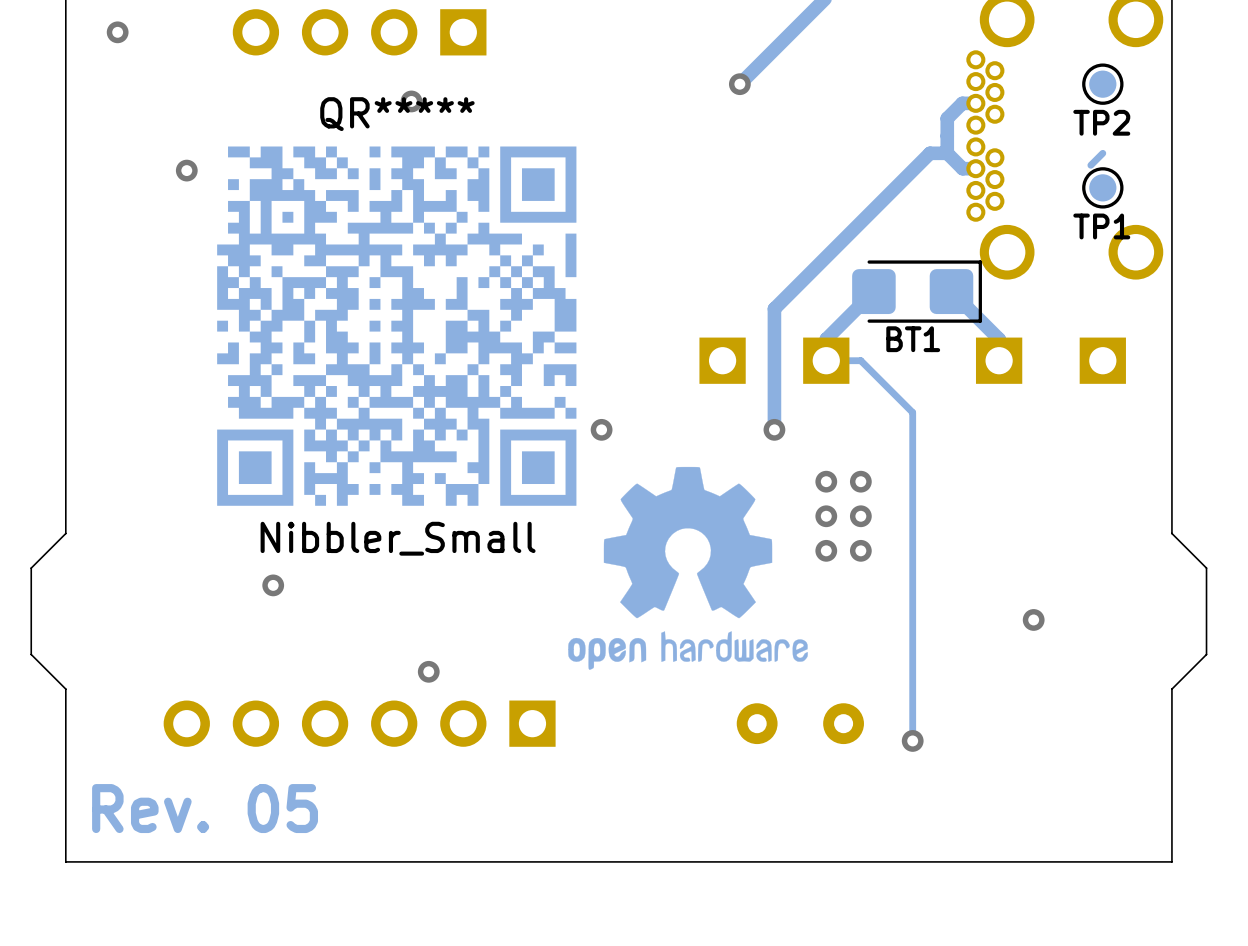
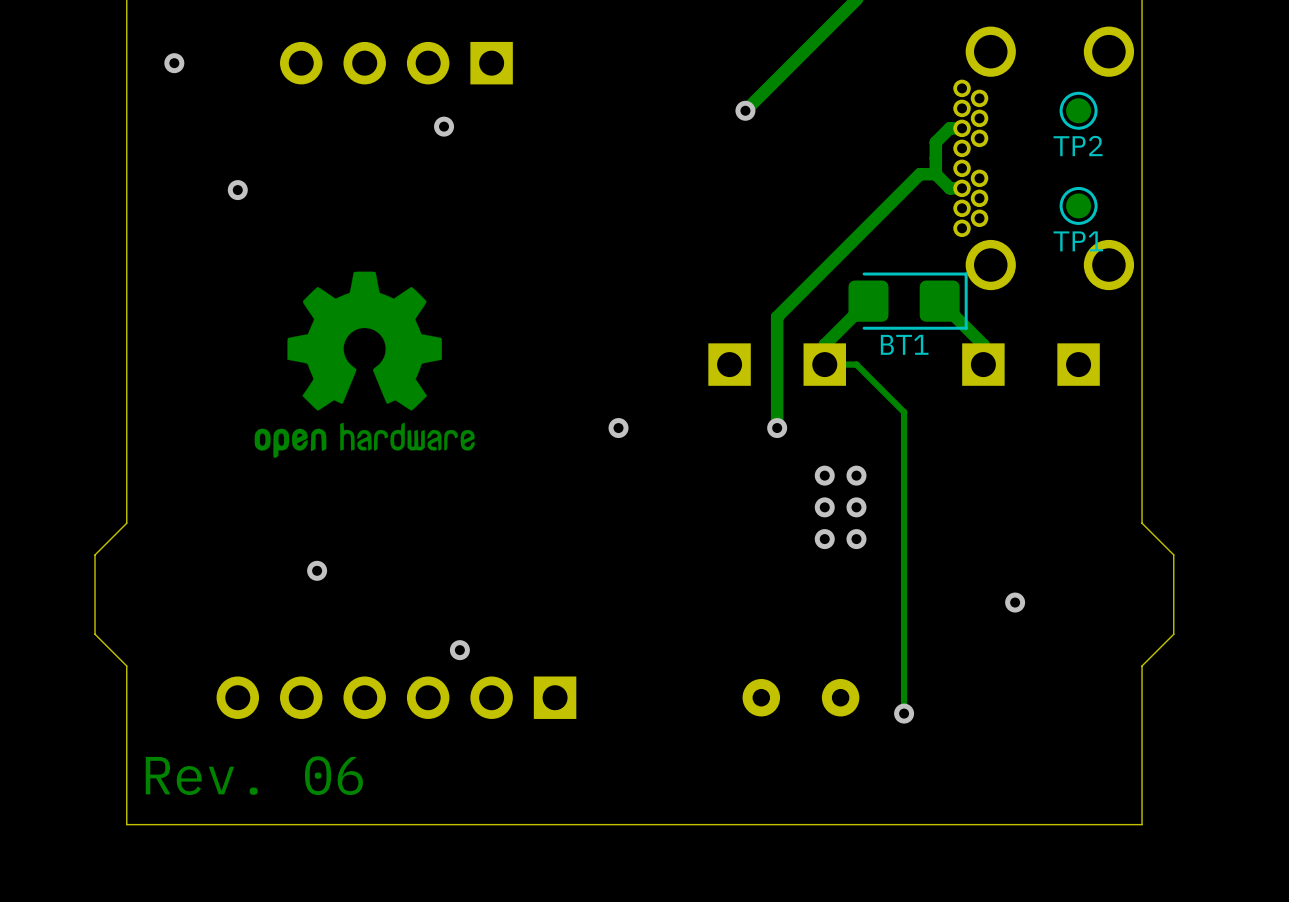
track: (1102, 153) (1090, 165) -> none
QR*****: Nibbler_Small (396, 326) -> none
drawing position: (688, 568) -> (364, 364)
text: Rev. 05 (205, 808) -> Rev. 06 (254, 775)

